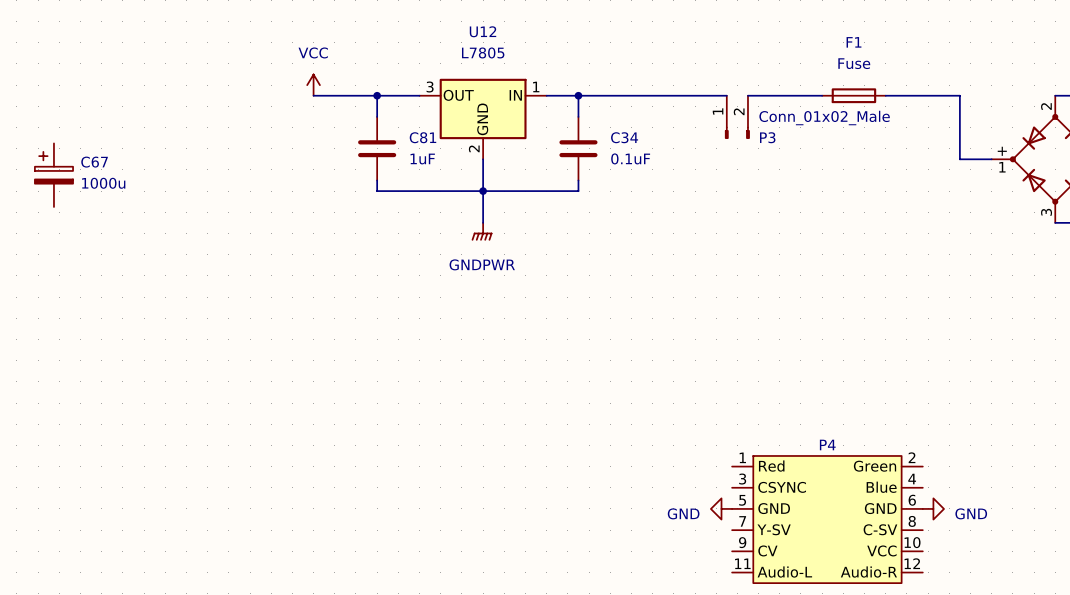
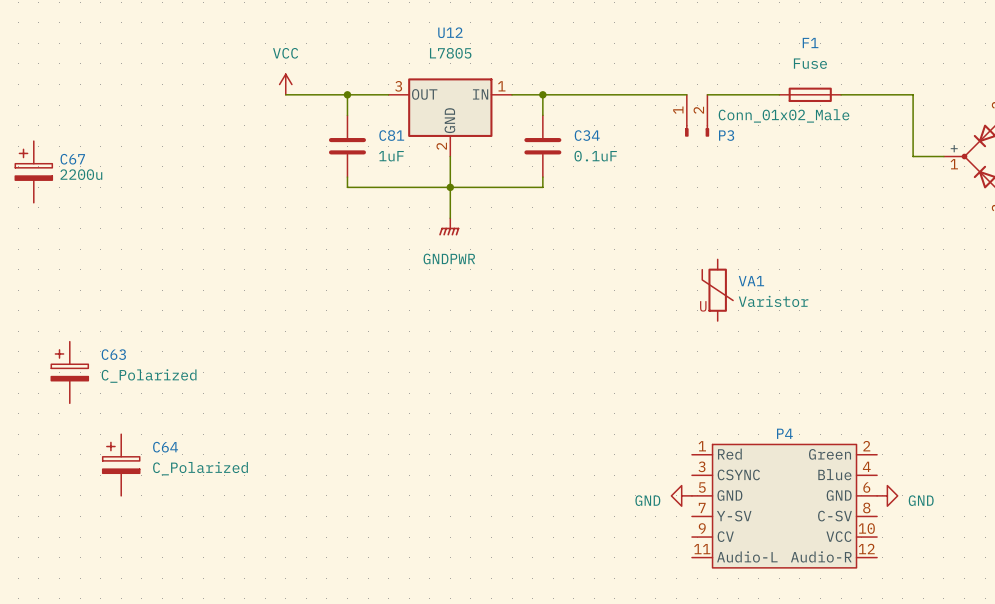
C67 value: 1000u (103, 183) -> 2200u (81, 174)
VA1: none -> Varistor (717, 290)
C63: none -> C_Polarized (69, 372)
C64: none -> C_Polarized (121, 465)

